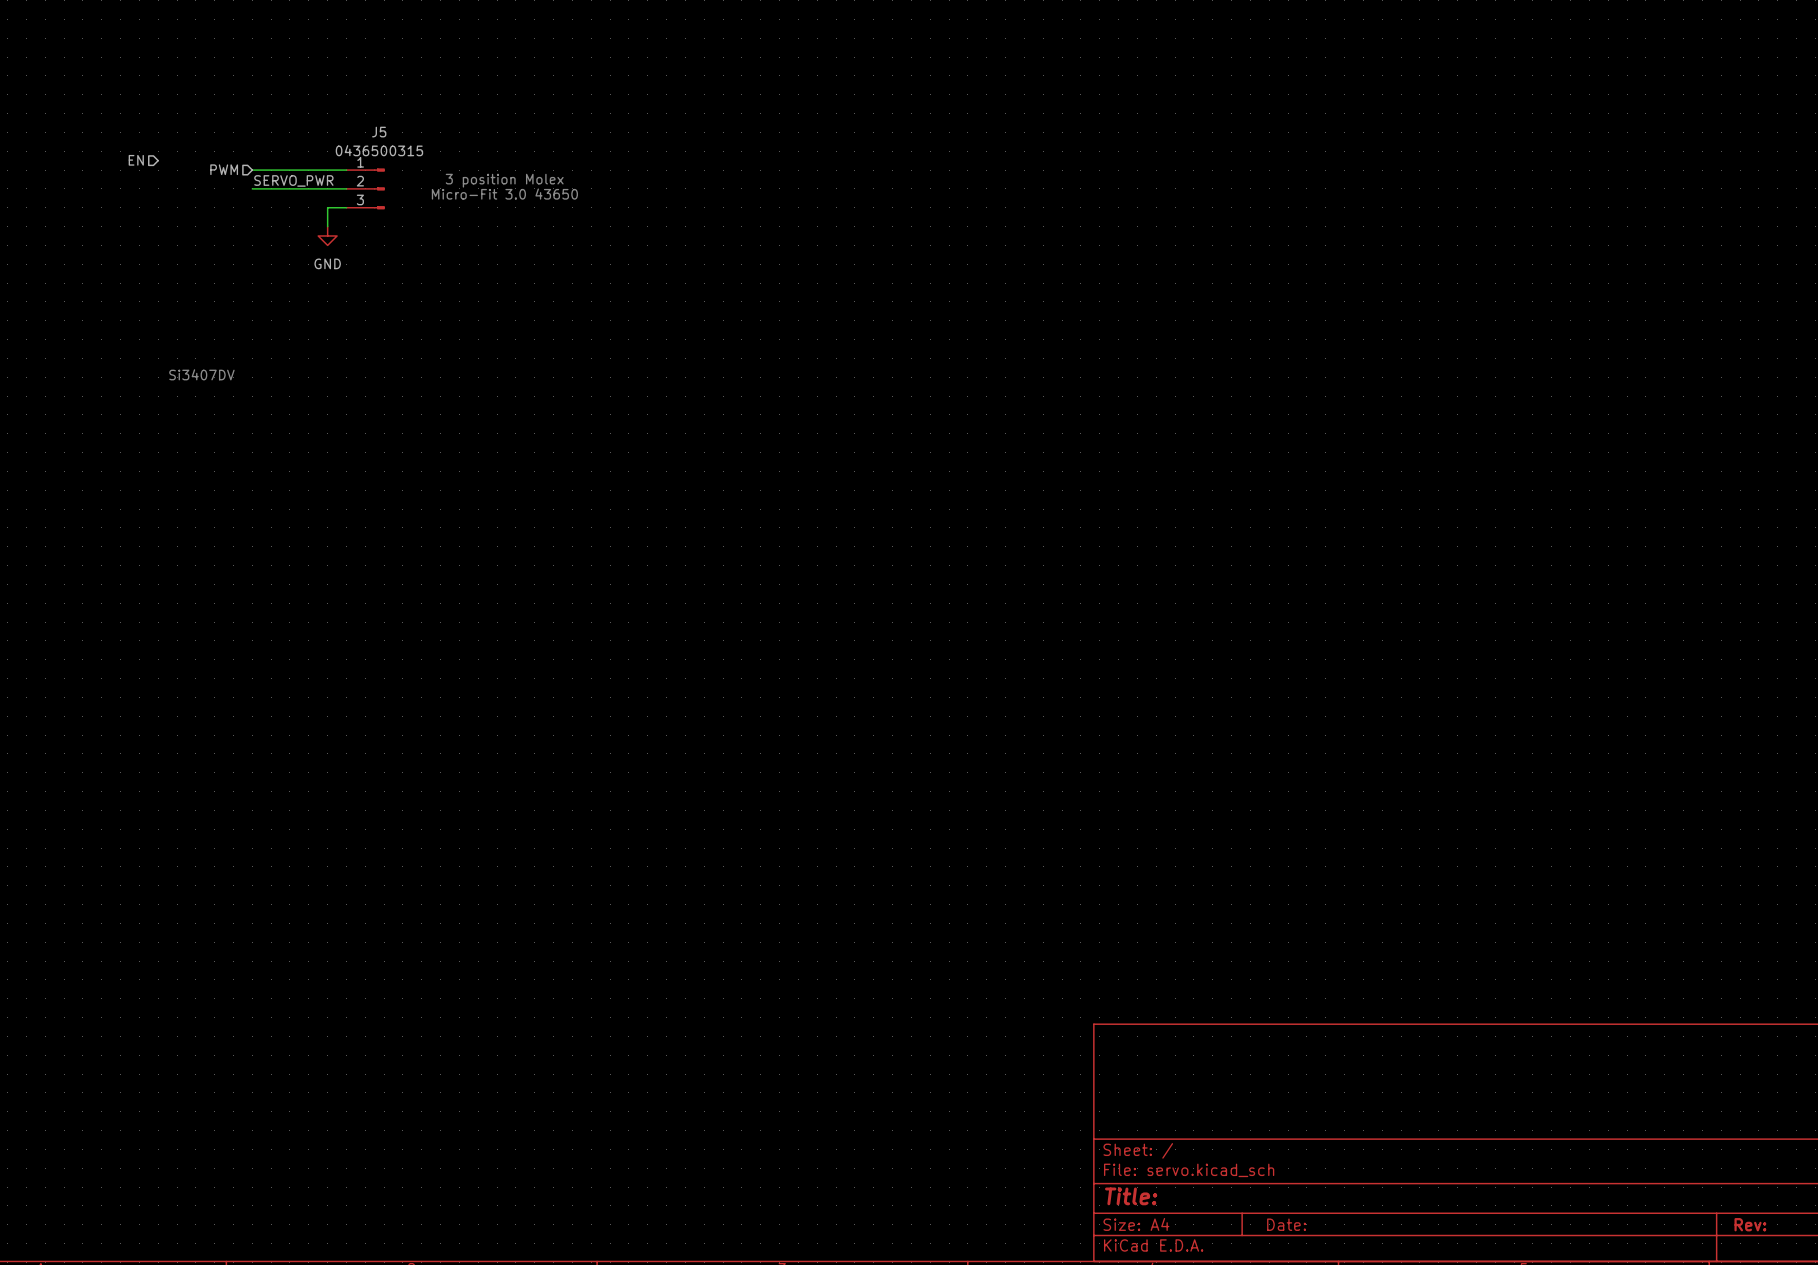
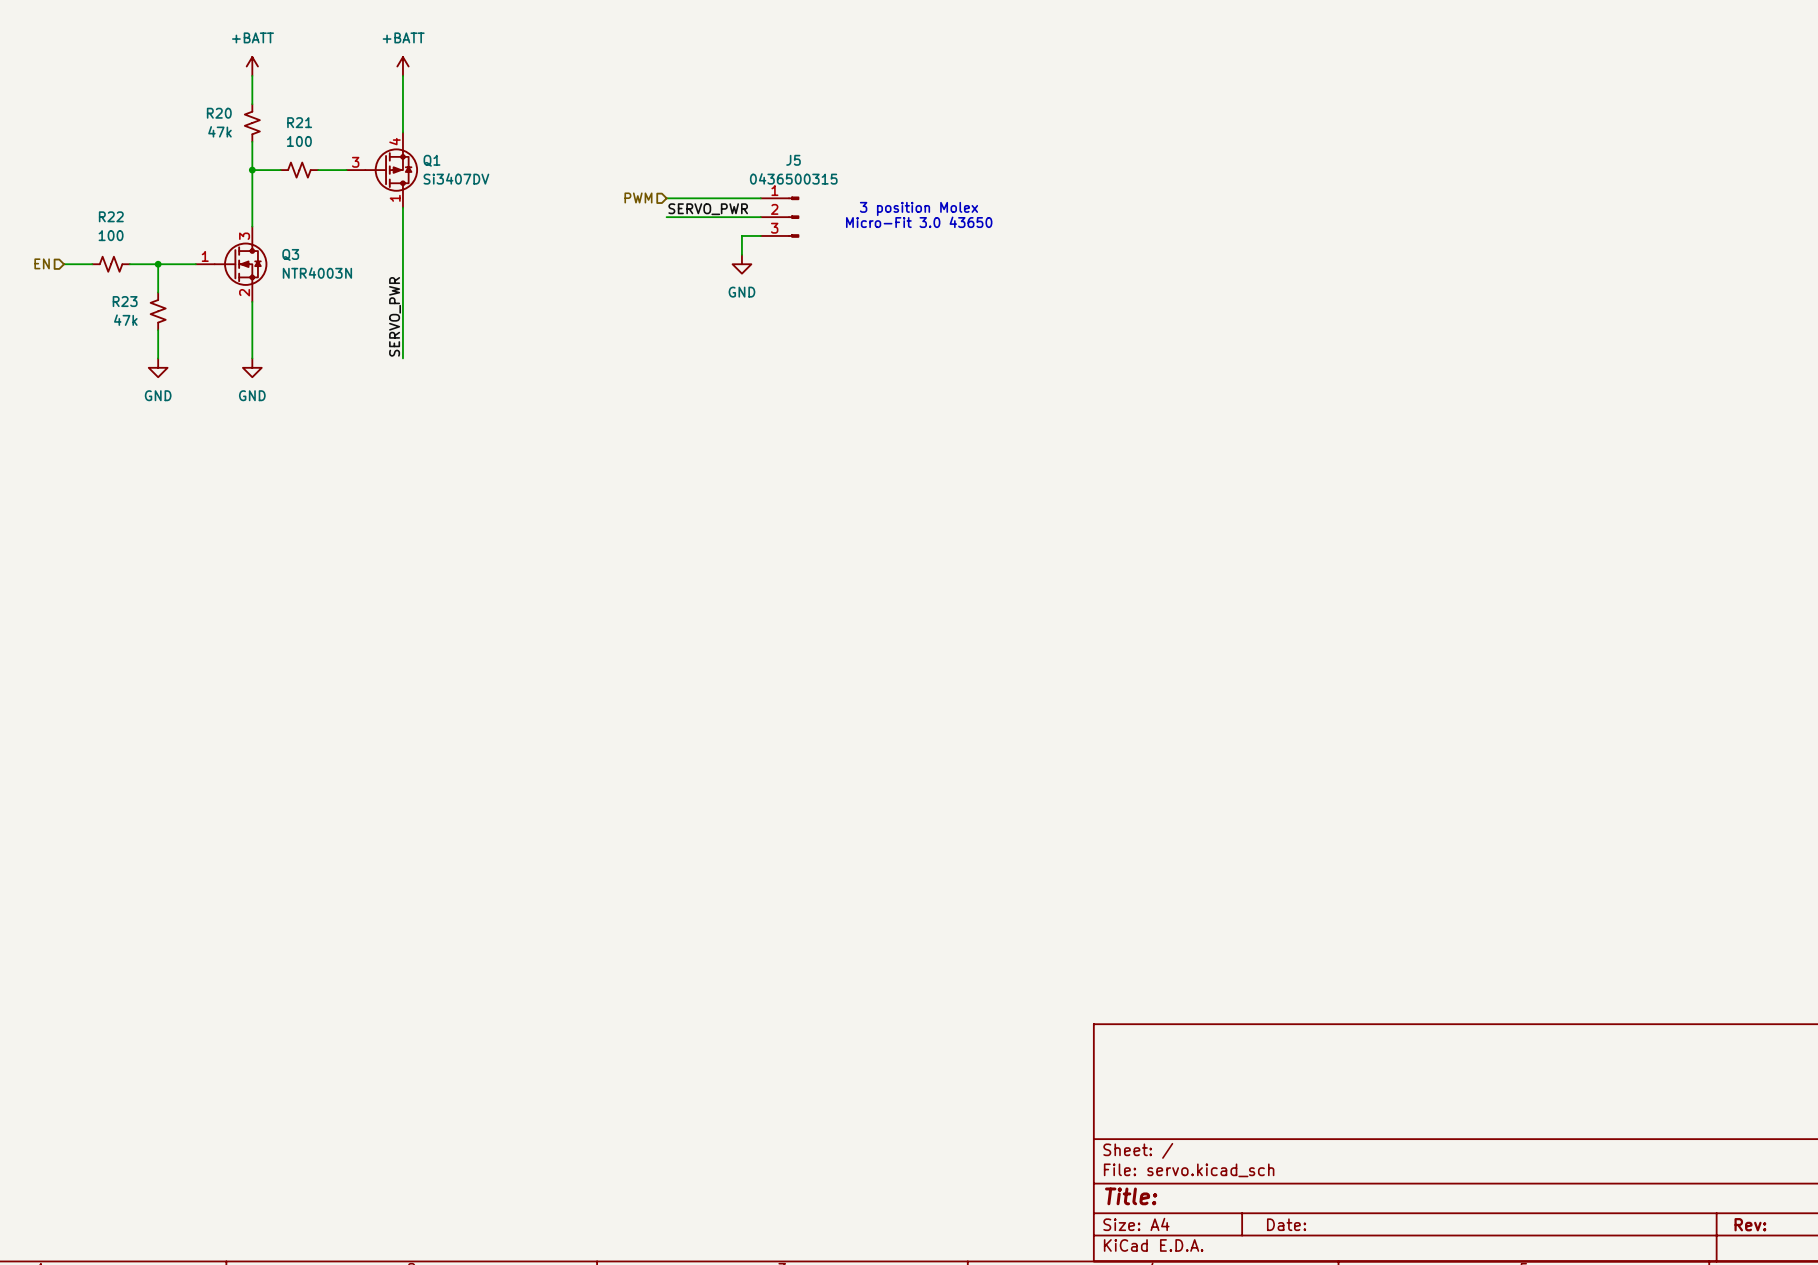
power symbol: none -> +BATT (252, 66)
power symbol: none -> +BATT (402, 66)
wire: none -> (252, 75) (252, 104)
wire: none -> (402, 75) (402, 132)
R20: none -> 47k (252, 122)
wire: none -> (252, 141) (252, 226)
hierarchical label position: EN (136, 160) -> EN (42, 263)
hierarchical label: PWM (224, 169) -> none
junction: none -> (252, 170)
R21: none -> 100 (299, 170)
Q1: none -> Si3407DV (382, 170)
label: SERVO_PWR (293, 180) -> none
text: 3 position Molex (504, 180) -> none
wire: (252, 188) (346, 188) -> none
J5 position: (365, 188) -> (779, 217)
text: Micro-Fit 3.0 43650 (504, 194) -> none
hierarchical label: none -> PWM (638, 197)
wire: none -> (666, 198) (760, 198)
wire: (346, 207) (327, 207) (327, 226) -> none
wire: none -> (402, 207) (402, 358)
text: none -> 3 position Molex (918, 208)
label: none -> SERVO_PWR (708, 209)
wire: none -> (666, 217) (760, 217)
text: none -> Micro-Fit 3.0 43650 (919, 222)
power symbol: GND (327, 235) -> none
wire: none -> (760, 235) (741, 235) (741, 254)
wire: none -> (64, 264) (92, 264)
R22: none -> 100 (111, 264)
wire: none -> (129, 264) (195, 264)
wire: none -> (158, 264) (158, 292)
junction: none -> (158, 264)
Q3: none -> NTR4003N (231, 264)
power symbol: none -> GND (741, 264)
wire: none -> (252, 301) (252, 358)
R23: none -> 47k (158, 311)
label: none -> SERVO_PWR (395, 316)
wire: none -> (158, 330) (158, 358)
power symbol: none -> GND (158, 367)
power symbol: none -> GND (252, 367)
text: Si3407DV (201, 374) -> none

